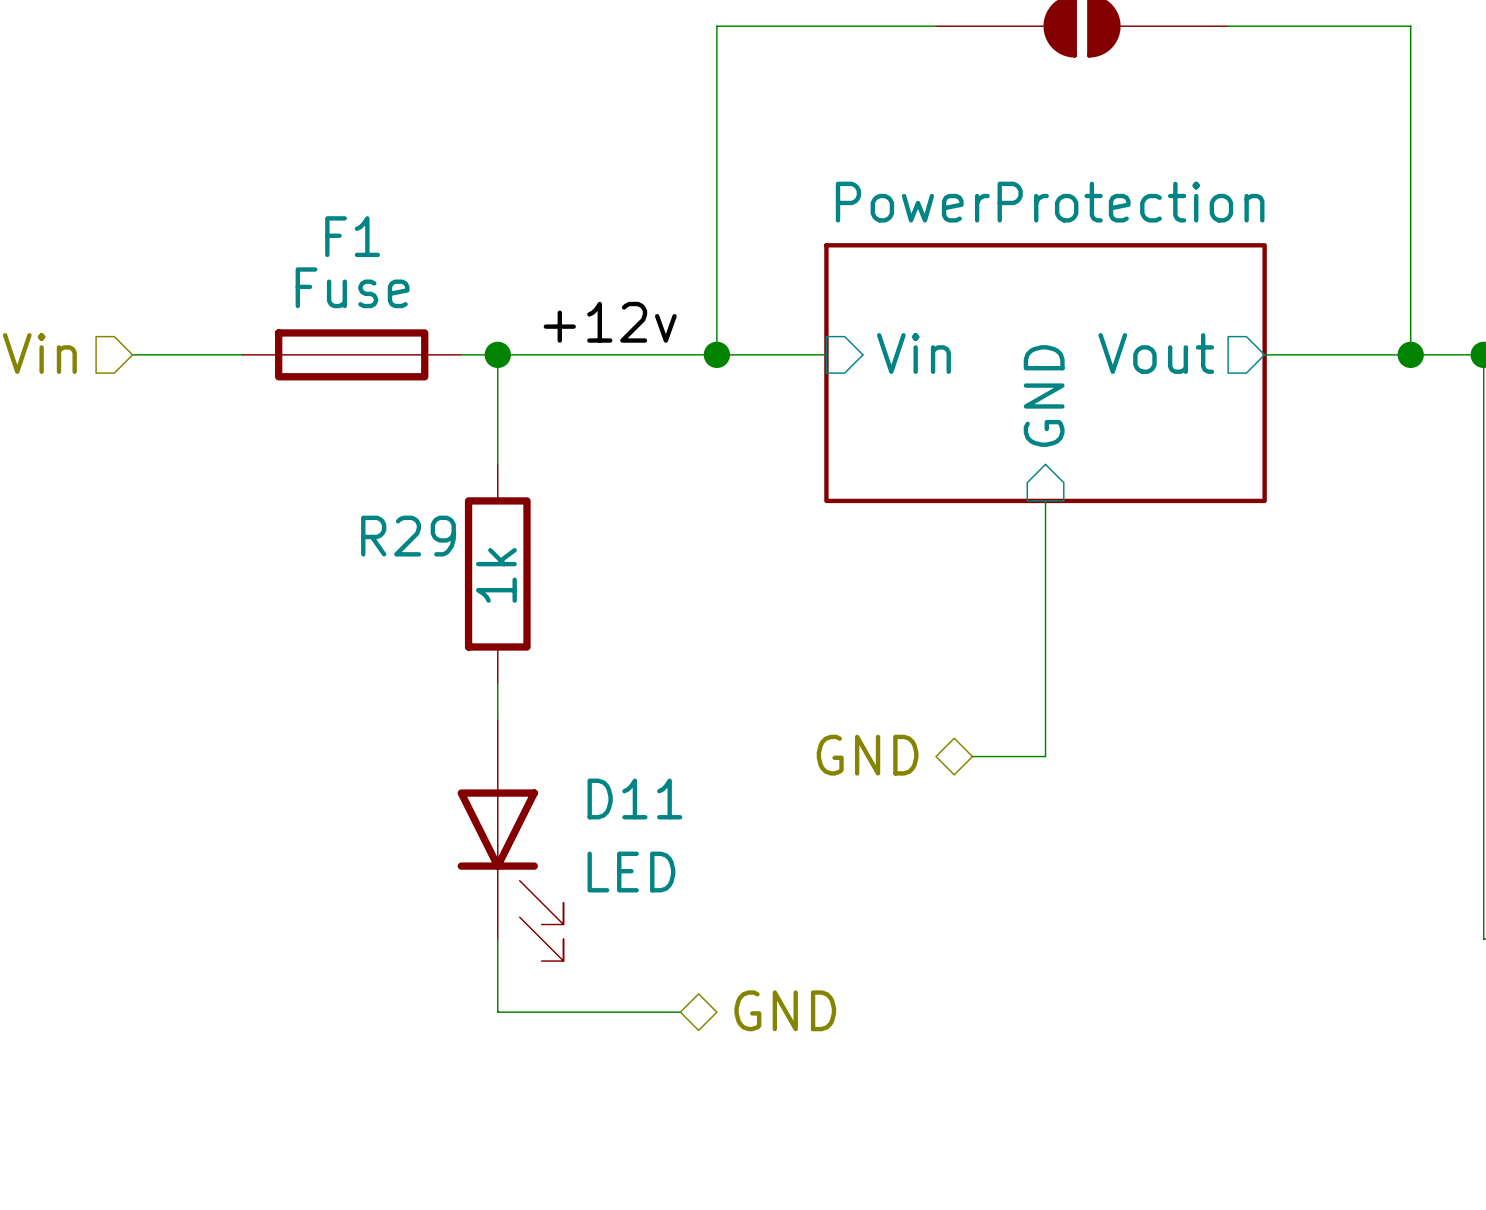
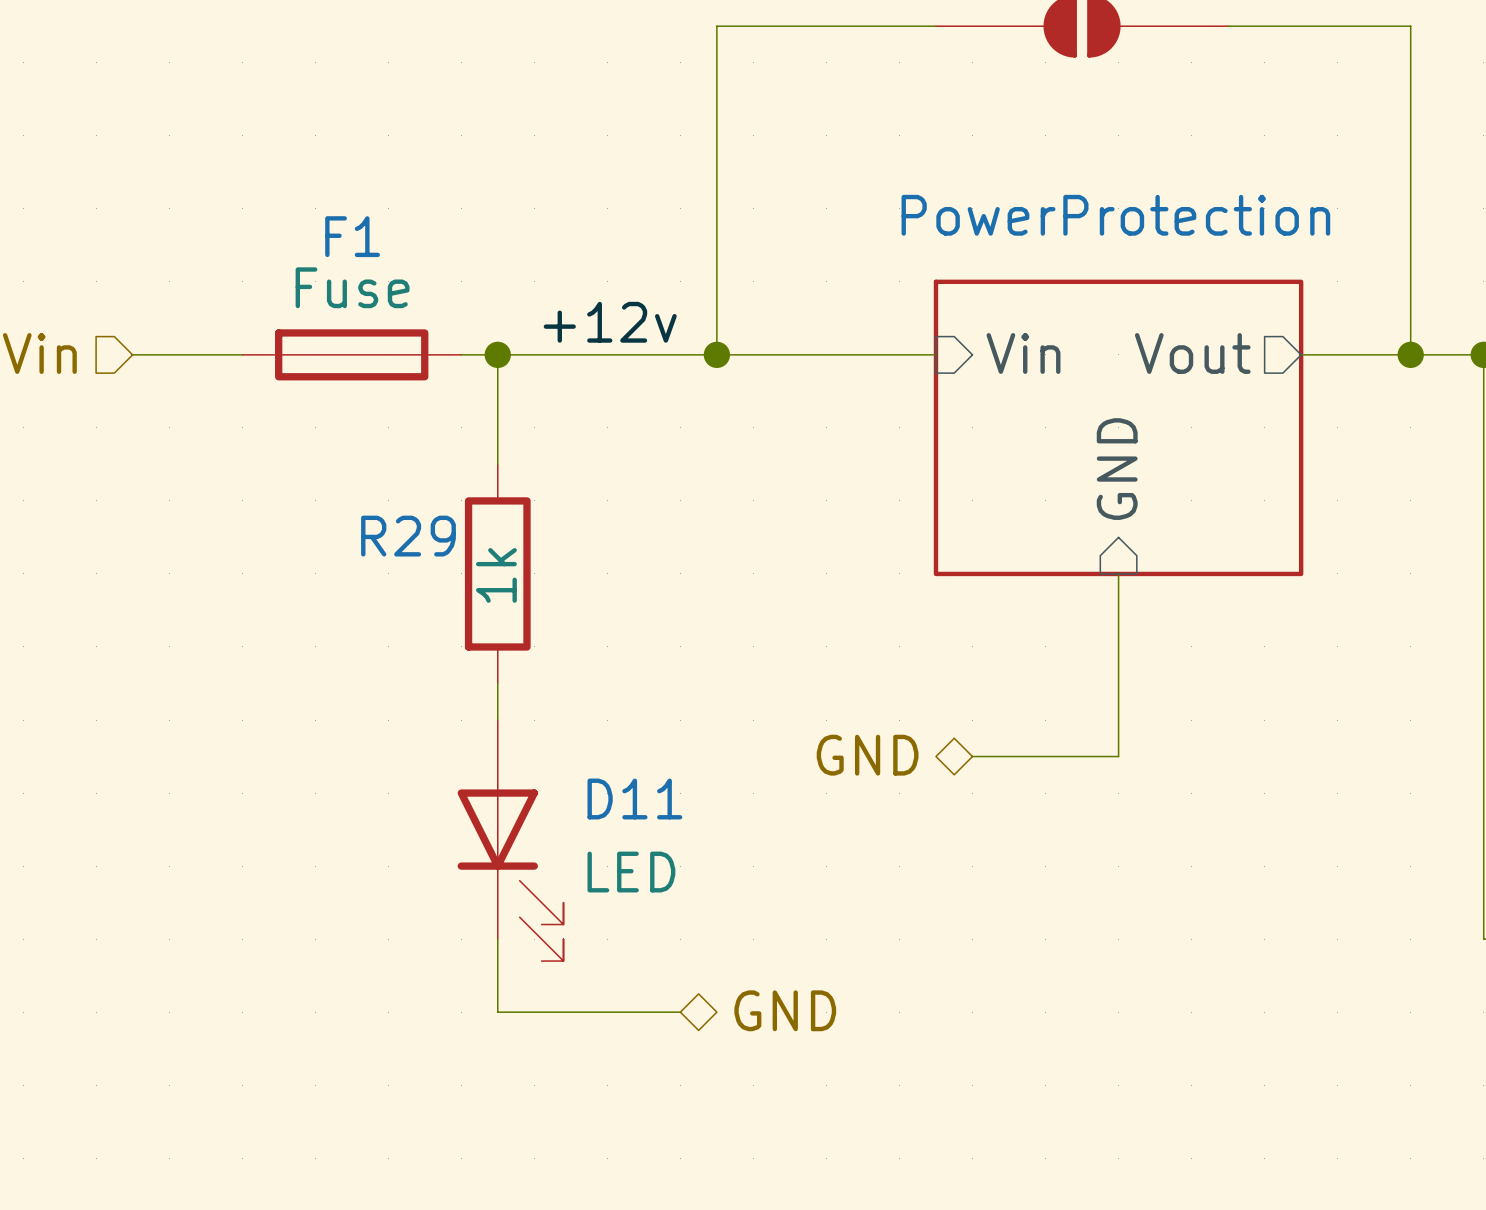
sheet pin position: Vin (913, 353) -> Vin (1023, 353)
sheet pin position: Vout (1156, 353) -> Vout (1192, 353)
wire: none -> (826, 354) (935, 354)
wire: (1264, 354) (1301, 354) -> none
sheet PowerProtection: (1045, 373) -> none
sheet pin position: GND (1044, 396) -> GND (1117, 469)
sheet PowerProtection: none -> (1118, 427)
wire: (1045, 500) (1045, 756) -> (1118, 573) (1118, 756) (1045, 756)

